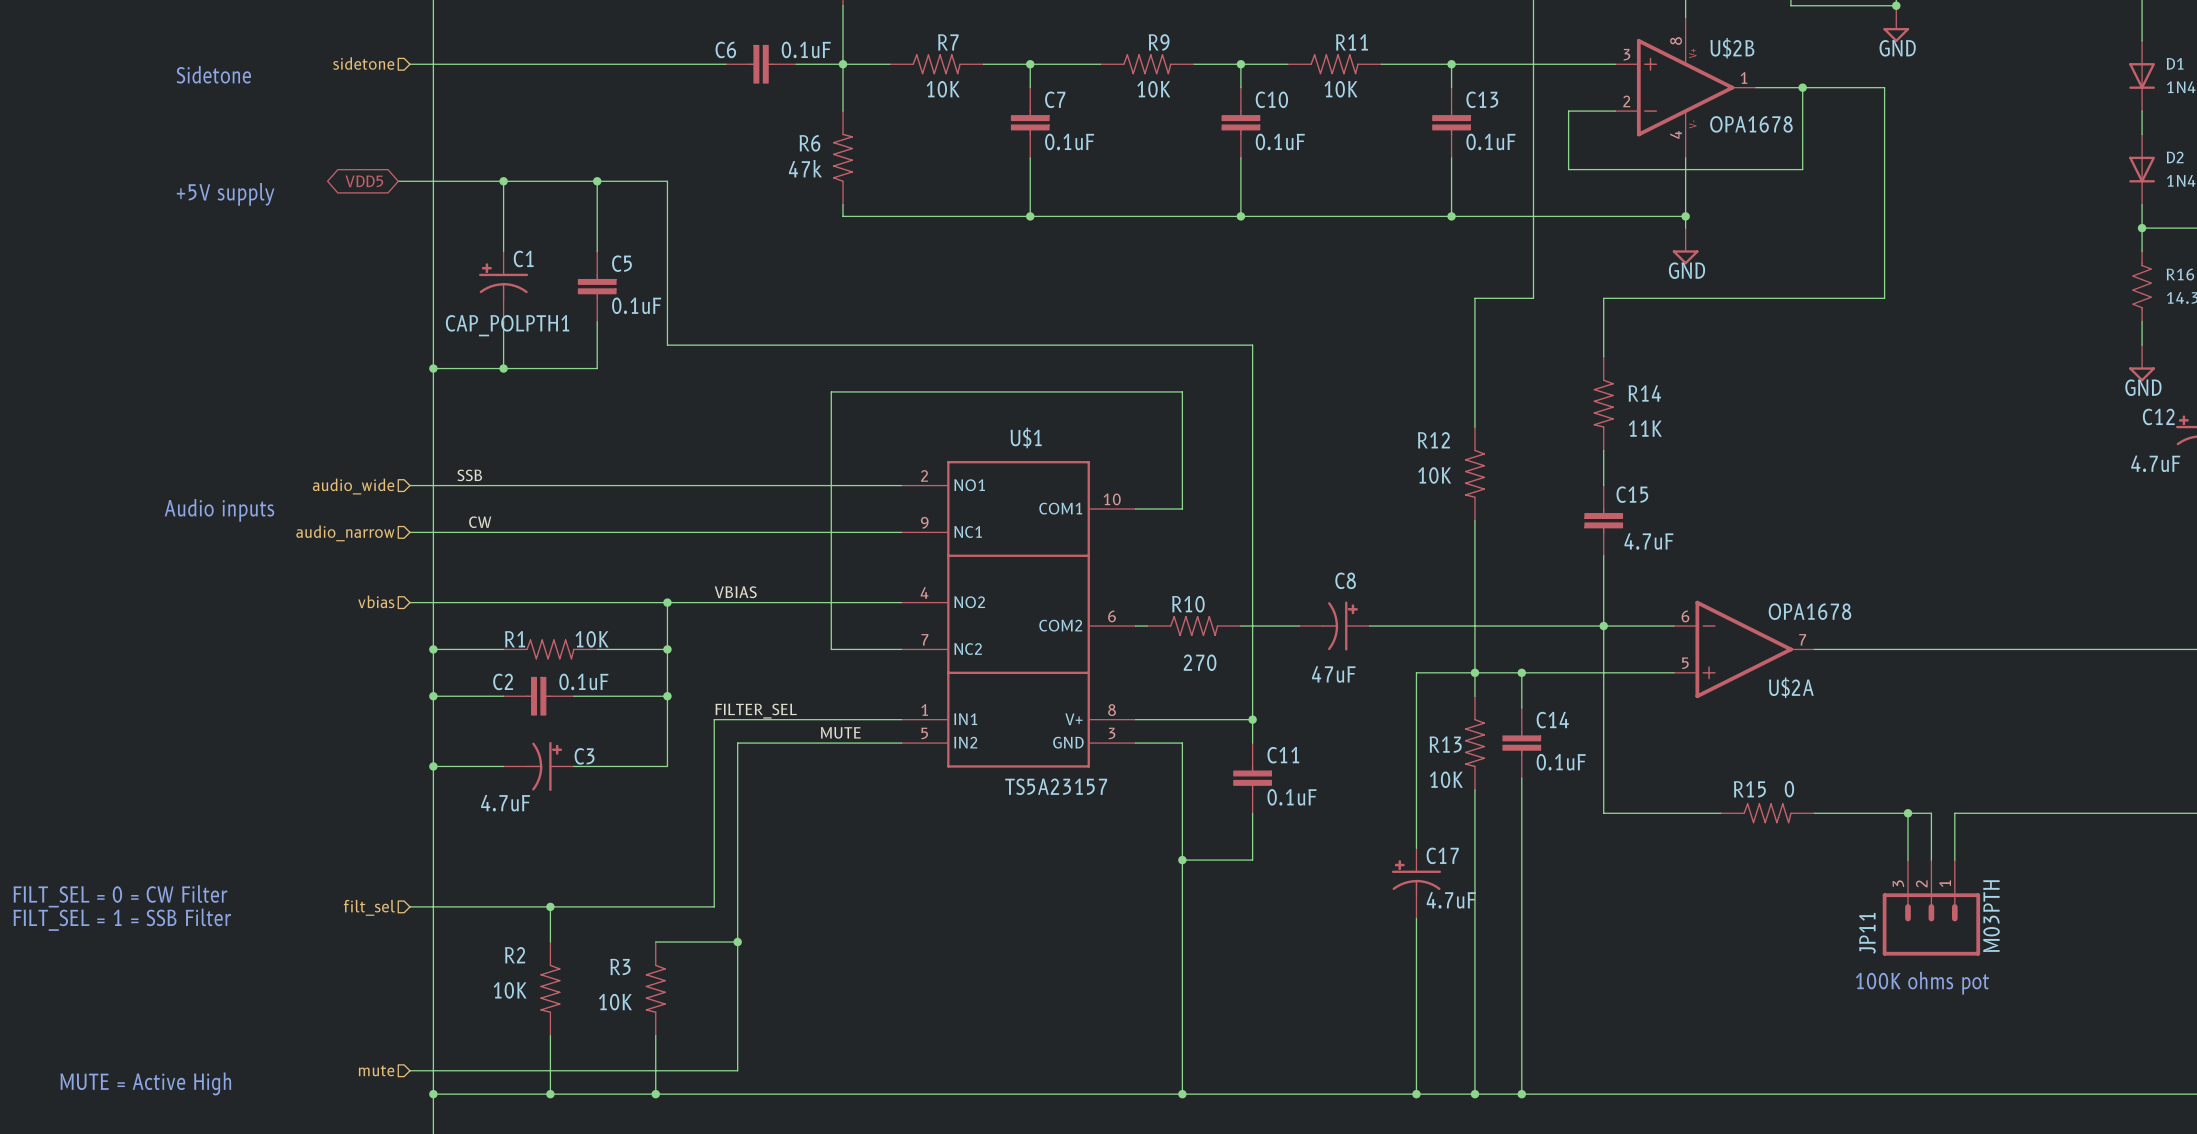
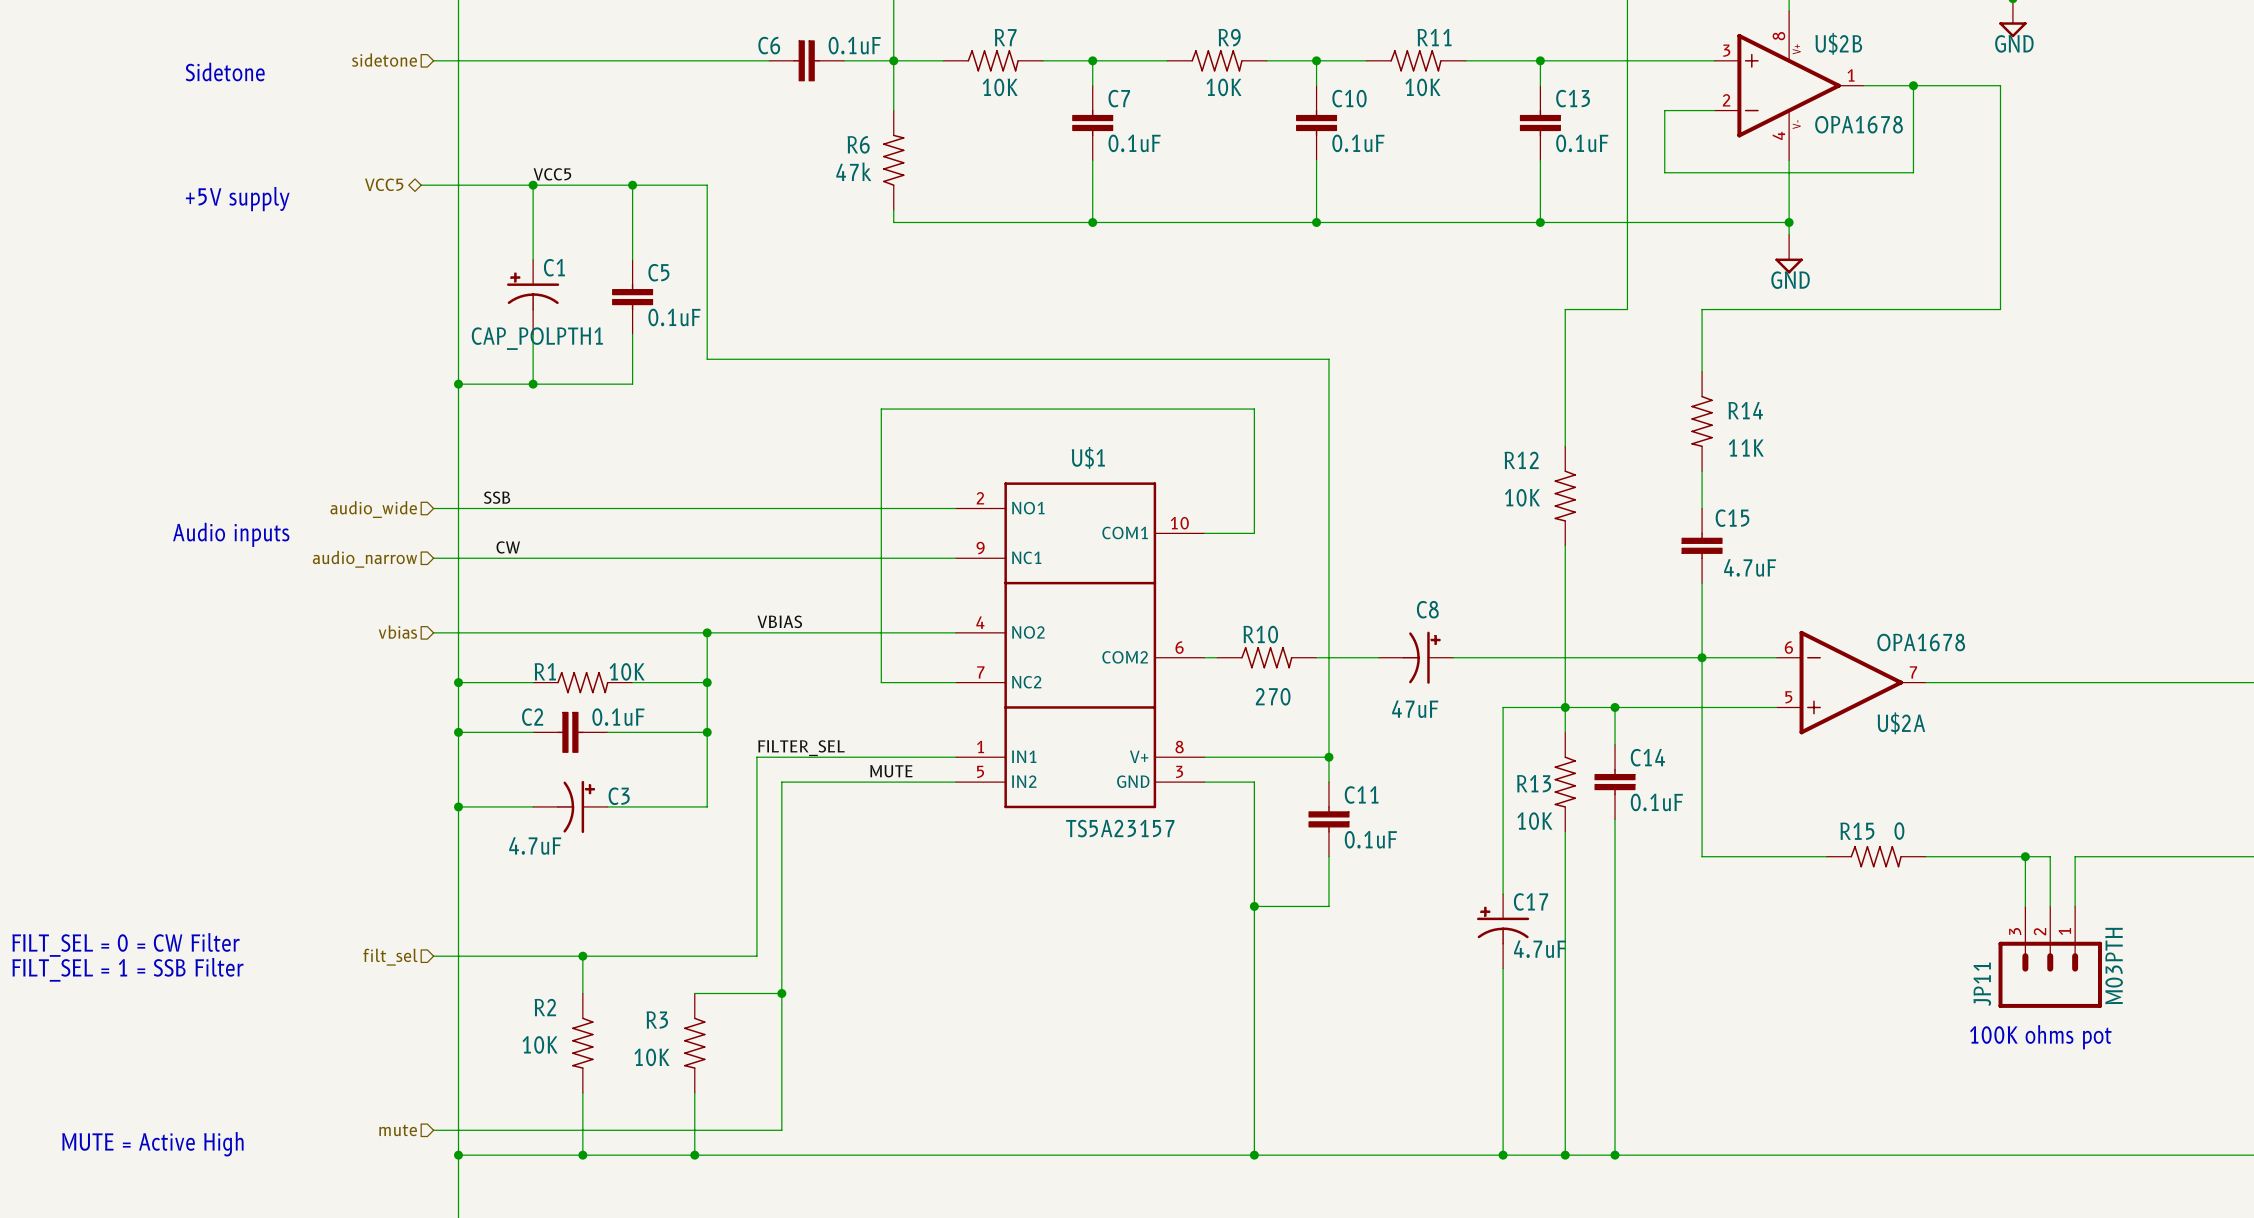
label: none -> VCC5 (552, 174)
hierarchical label: none -> VCC5 (384, 184)
global label: VDD5 (364, 181) -> none

